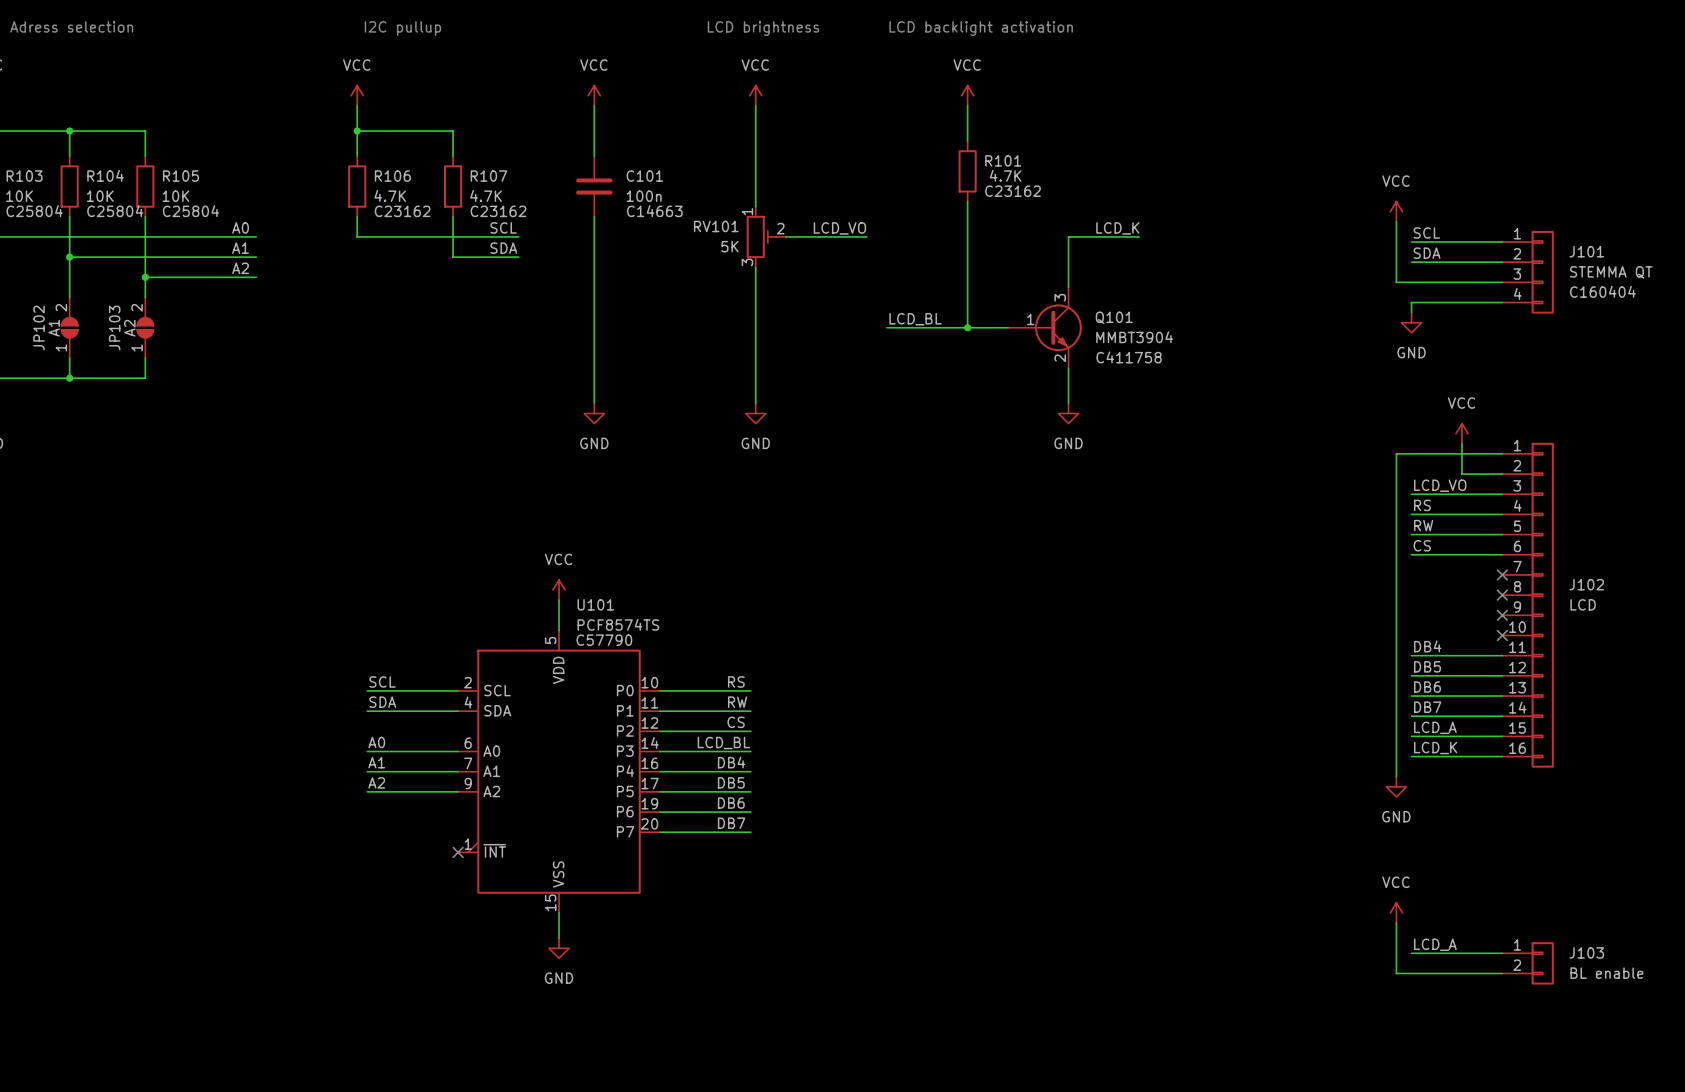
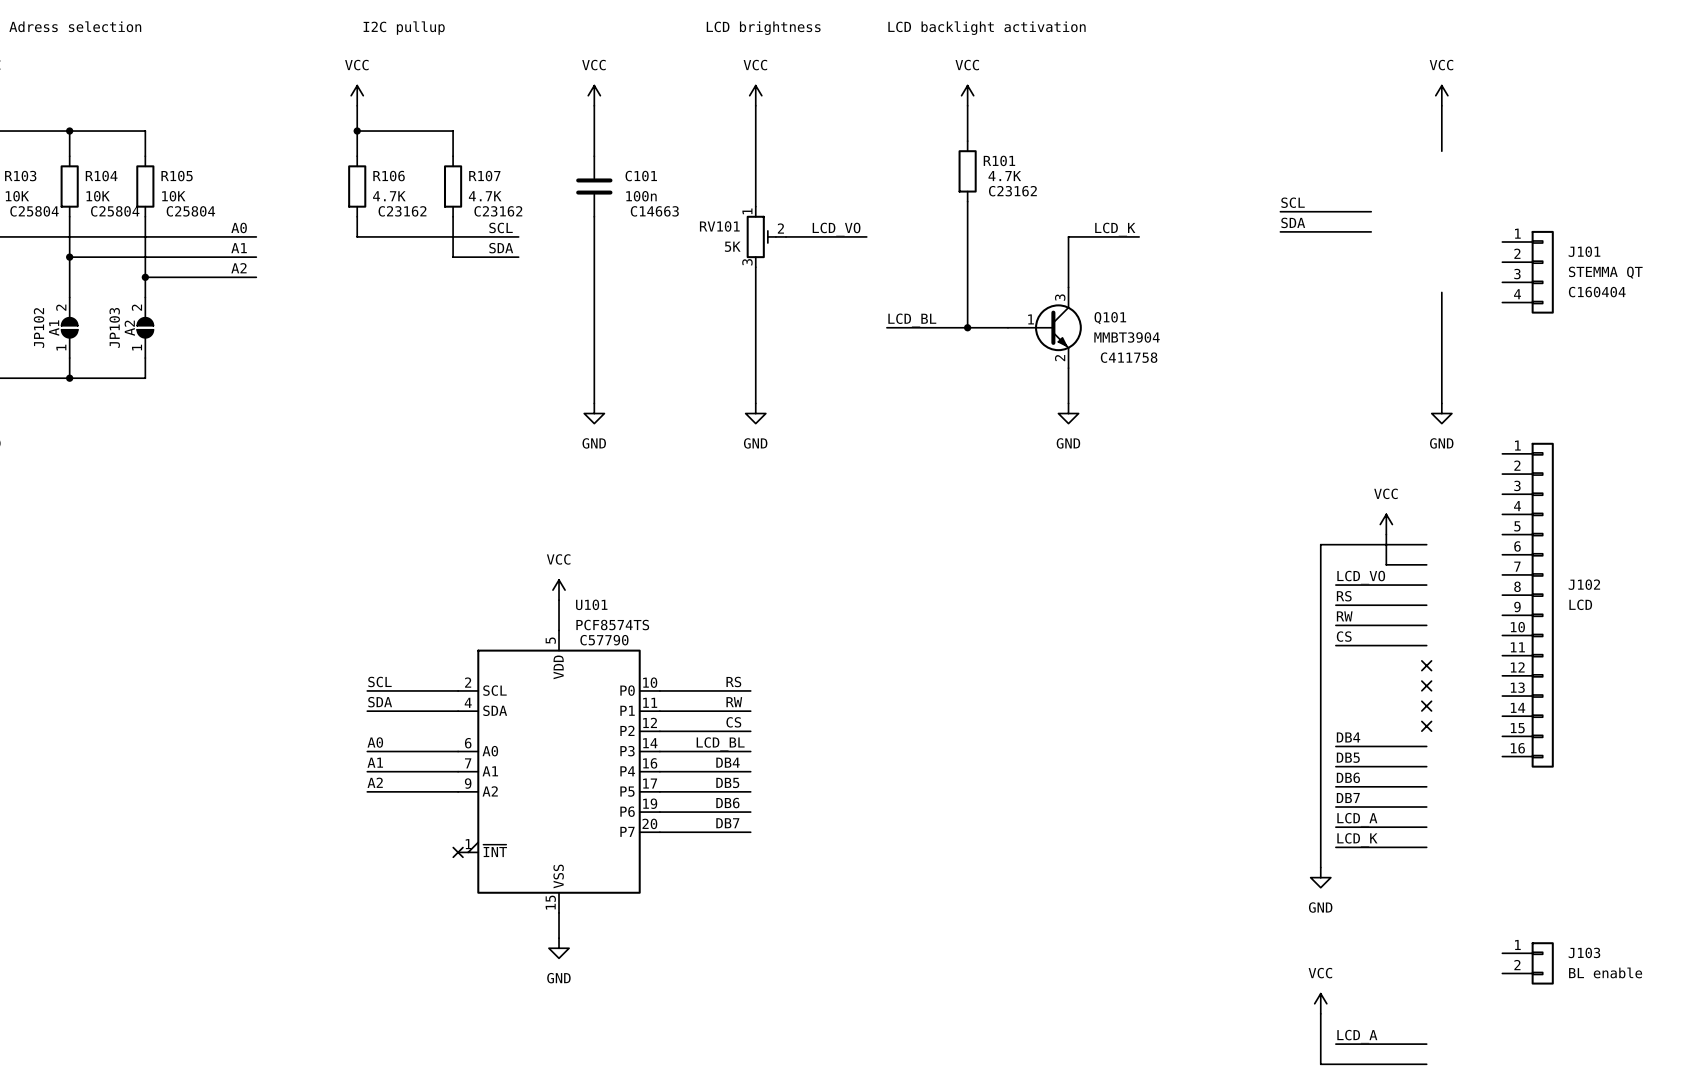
wire: none -> (1441, 105) (1441, 151)
power symbol position: VCC (1396, 211) -> VCC (1441, 95)
wire: (1396, 221) (1396, 282) (1502, 282) -> none
label position: SCL (1426, 232) -> SCL (1293, 202)
wire: (1411, 242) (1502, 242) -> (1280, 211) (1371, 211)
label position: SDA (1427, 253) -> SDA (1293, 222)
wire: (1411, 262) (1502, 262) -> (1280, 231) (1371, 231)
wire: none -> (1441, 292) (1441, 403)
wire: (1502, 302) (1411, 302) (1411, 312) -> none
power symbol position: GND (1411, 322) -> GND (1441, 413)
power symbol position: VCC (1462, 433) -> VCC (1386, 524)
wire: (1462, 443) (1462, 474) (1502, 474) -> (1386, 534) (1386, 564) (1426, 564)
wire: (1502, 453) (1396, 453) (1396, 776) -> (1426, 544) (1320, 544) (1320, 867)
label position: LCD_VO (1440, 485) -> LCD_VO (1361, 577)
wire: (1411, 494) (1502, 494) -> (1335, 585) (1426, 585)
label position: RS (1422, 505) -> RS (1344, 596)
wire: (1411, 514) (1502, 514) -> (1335, 605) (1426, 605)
label position: RW (1423, 525) -> RW (1344, 616)
wire: (1411, 534) (1502, 534) -> (1335, 625) (1426, 625)
label position: CS (1422, 545) -> CS (1344, 636)
wire: (1411, 554) (1502, 554) -> (1335, 645) (1426, 645)
no-connect mark: (1502, 574) -> none
no-connect mark: (1502, 595) -> none
no-connect mark: (1502, 615) -> none
no-connect mark: (1502, 635) -> none
label position: DB4 (1427, 646) -> DB4 (1348, 737)
wire: (1411, 655) (1502, 655) -> (1335, 746) (1426, 746)
no-connect mark: none -> (1426, 665)
label position: DB5 (1427, 666) -> DB5 (1348, 757)
wire: (1411, 675) (1502, 675) -> (1335, 766) (1426, 766)
no-connect mark: none -> (1426, 685)
label position: DB6 (1427, 687) -> DB6 (1348, 777)
wire: (1411, 696) (1502, 696) -> (1335, 786) (1426, 786)
no-connect mark: none -> (1426, 706)
label position: DB7 (1427, 707) -> DB7 (1348, 798)
wire: (1411, 716) (1502, 716) -> (1335, 807) (1426, 807)
no-connect mark: none -> (1426, 726)
label: LCD_A (1435, 727) -> none
wire: (1411, 736) (1502, 736) -> (1335, 827) (1426, 827)
label position: LCD_K (1435, 748) -> LCD_K (1357, 839)
wire: (1411, 756) (1502, 756) -> (1335, 847) (1426, 847)
power symbol position: GND (1396, 786) -> GND (1320, 877)
label: none -> LCD_A (1357, 819)
power symbol position: VCC (1396, 912) -> VCC (1320, 1003)
wire: (1396, 923) (1396, 973) (1502, 973) -> (1320, 1013) (1320, 1064) (1426, 1064)
label: LCD_A (1435, 944) -> none
wire: (1411, 953) (1502, 953) -> (1335, 1044) (1426, 1044)
label: none -> LCD_A (1357, 1036)

